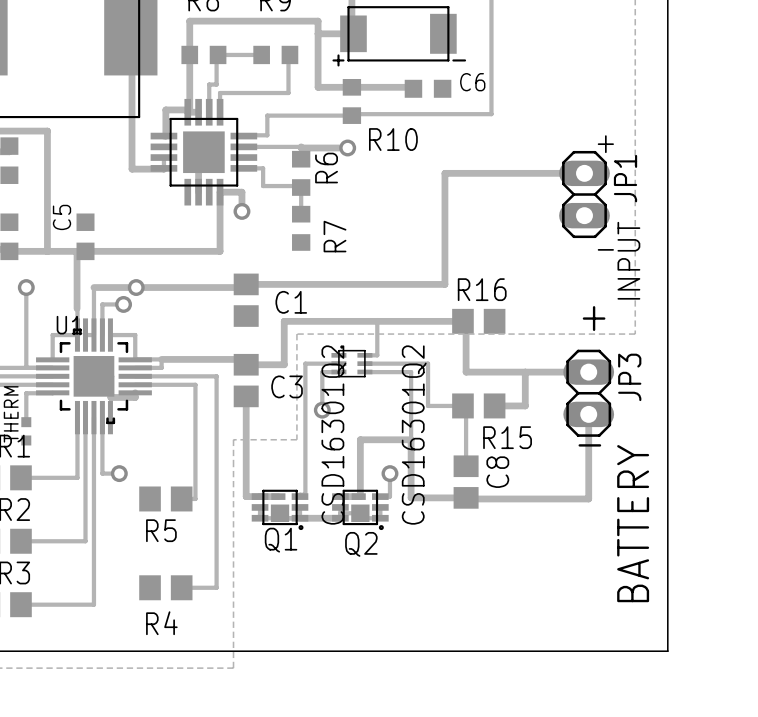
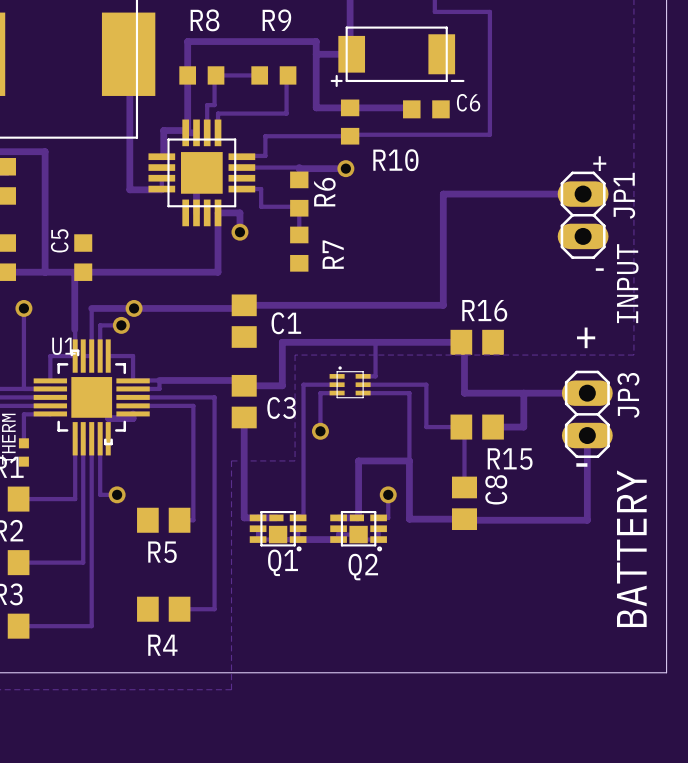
Q1 value: CSD16301Q2 (333, 435) -> none
Q2 value: CSD16301Q2 (414, 435) -> none

